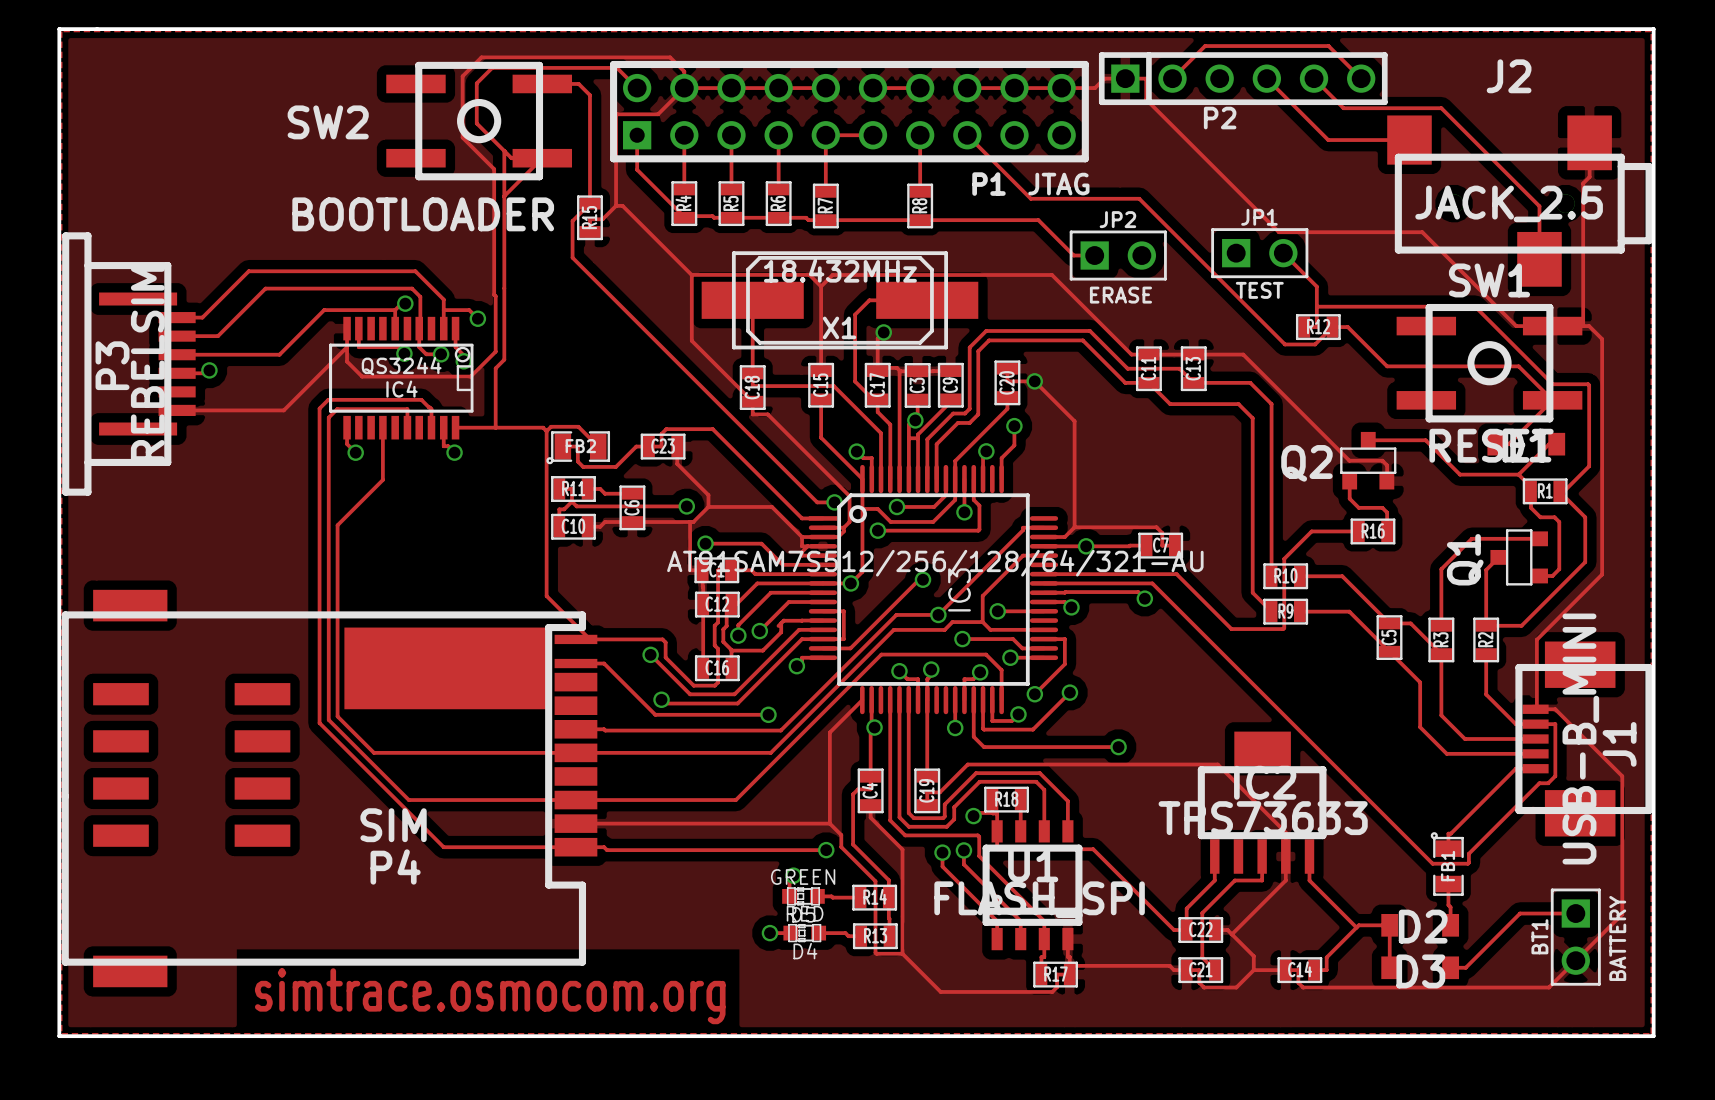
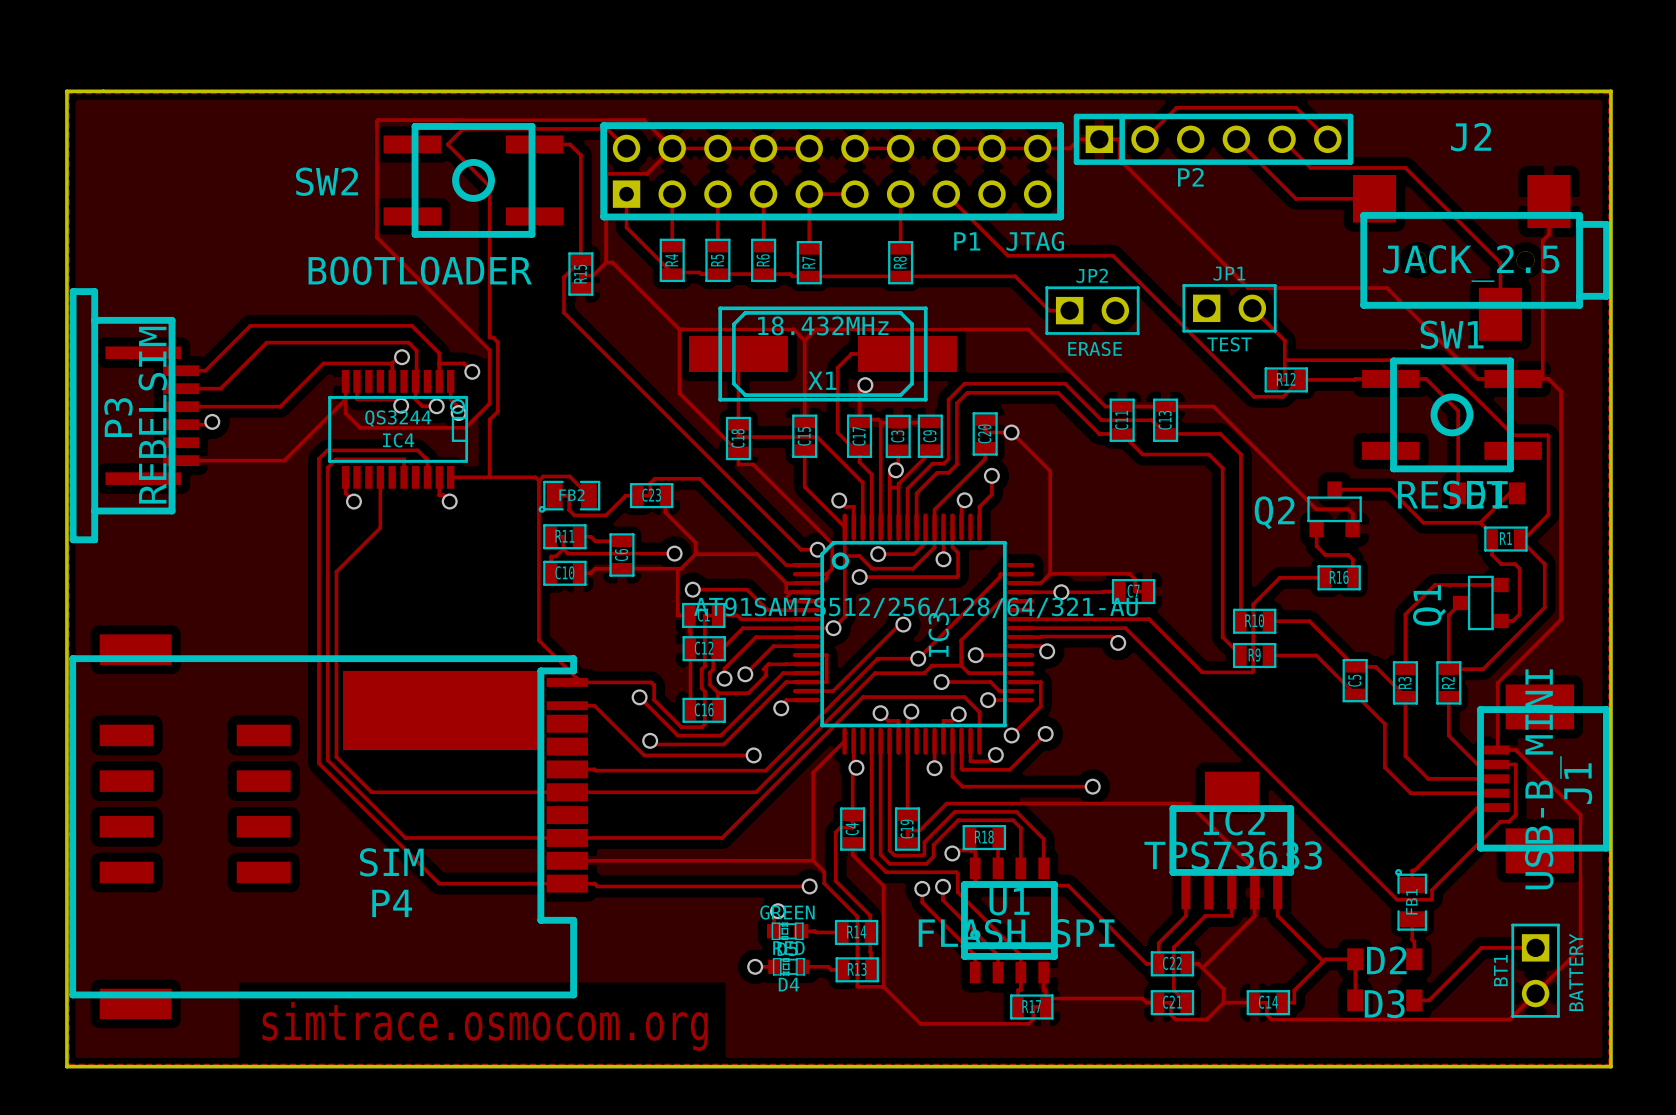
track: (492, 67) (476, 83) (476, 123) (511, 158) (542, 158) (504, 196) -> none
track: (684, 88) (684, 71) (670, 57) (481, 57) (462, 76) (462, 137) (494, 169) (494, 294) -> (672, 148) (643, 120) (376, 121) (376, 237) (488, 348)
track: (504, 150) (504, 288) -> (486, 128) (463, 128) (447, 144) (489, 186) (489, 337) (493, 337) (497, 342)
track: (1347, 327) (1387, 366) (1518, 366) (1552, 400) (1508, 444) (1495, 444) -> (1314, 379) (1426, 378) (1458, 410) (1458, 493)

